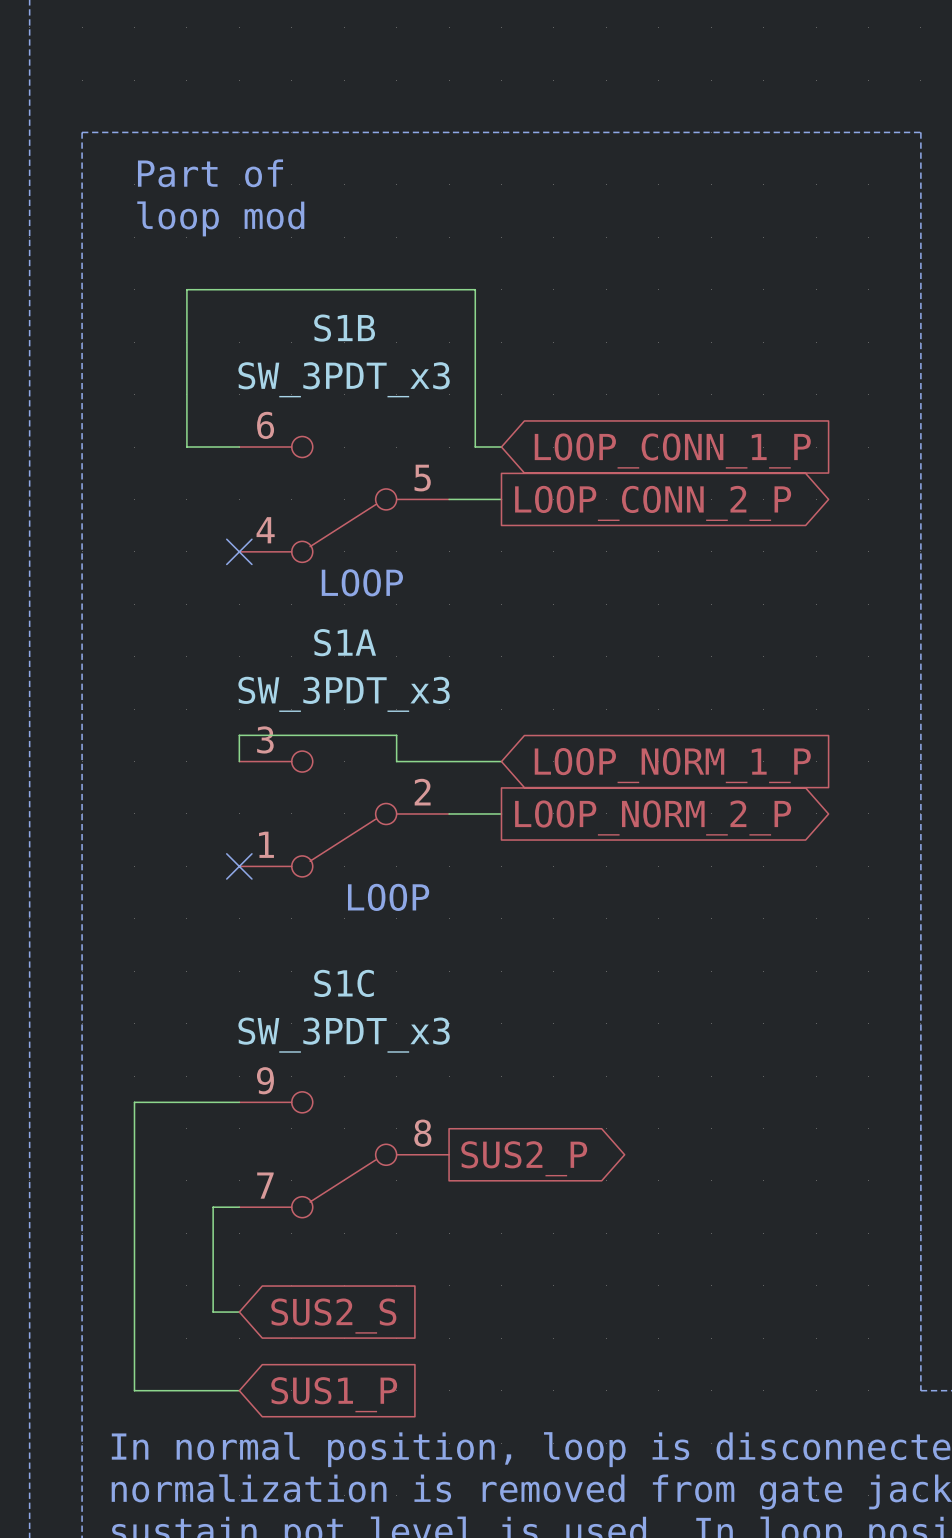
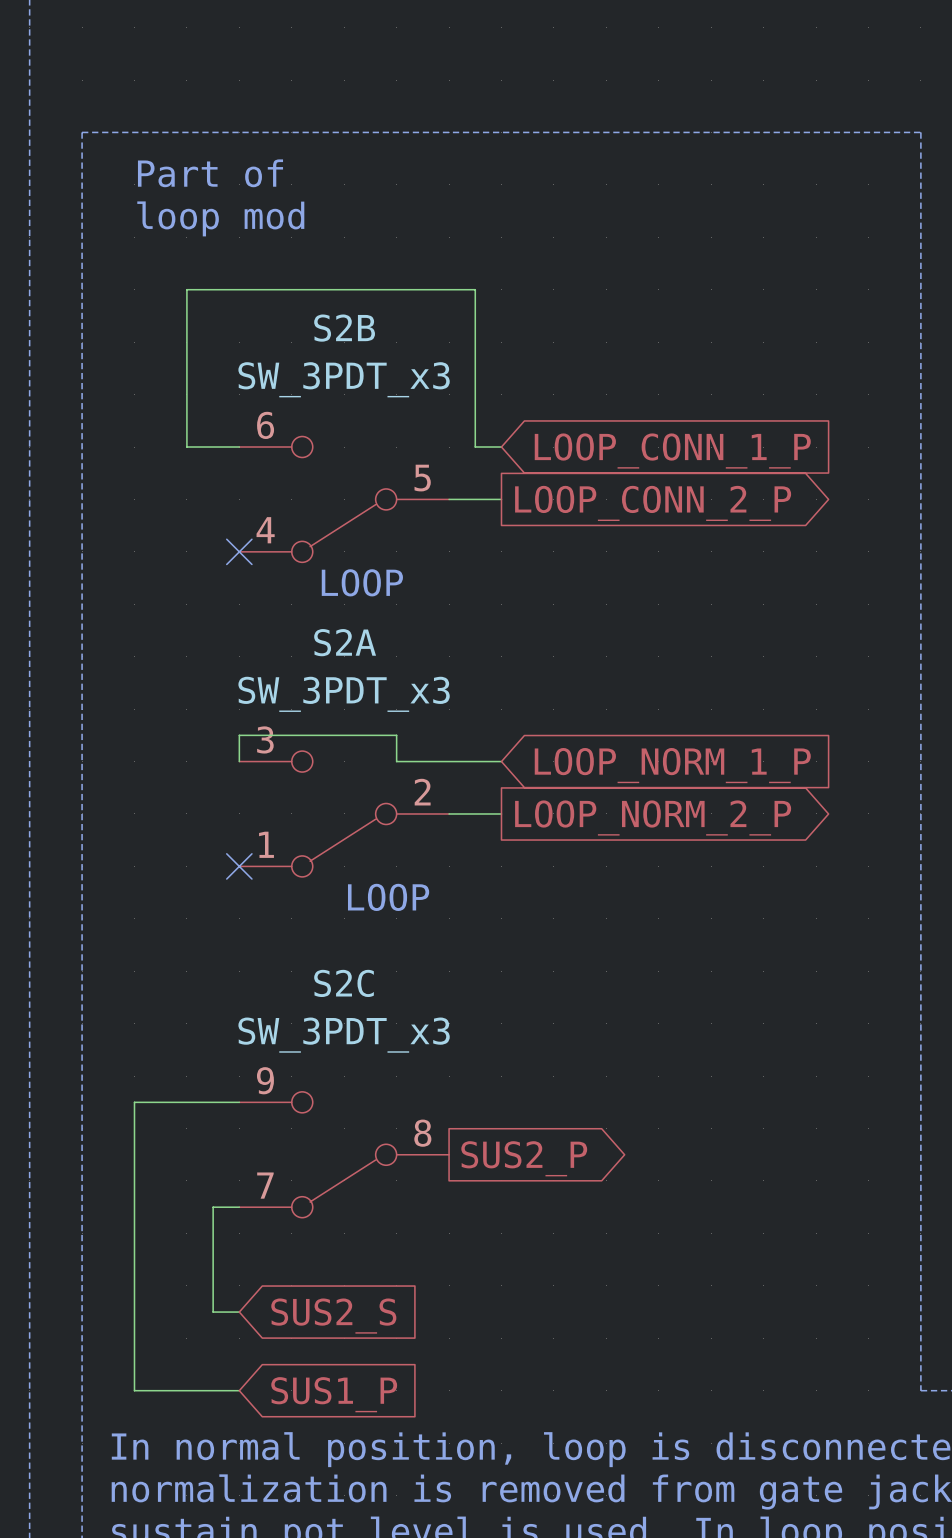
S1B name: S1B (344, 328) -> S2B (344, 328)
S1A name: S1A (345, 642) -> S2A (345, 642)
S1C name: S1C (344, 983) -> S2C (344, 983)

